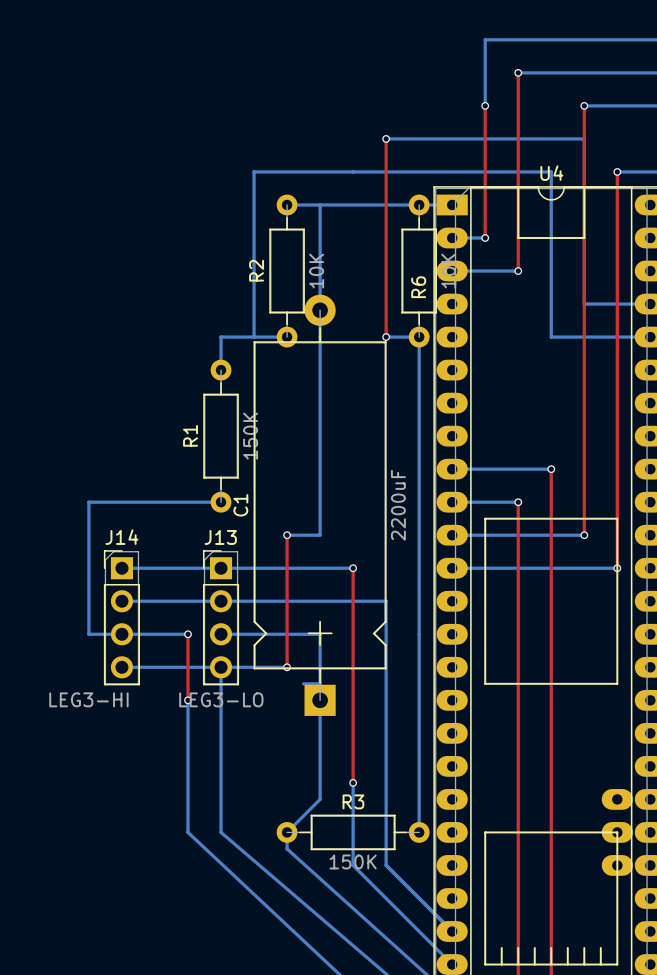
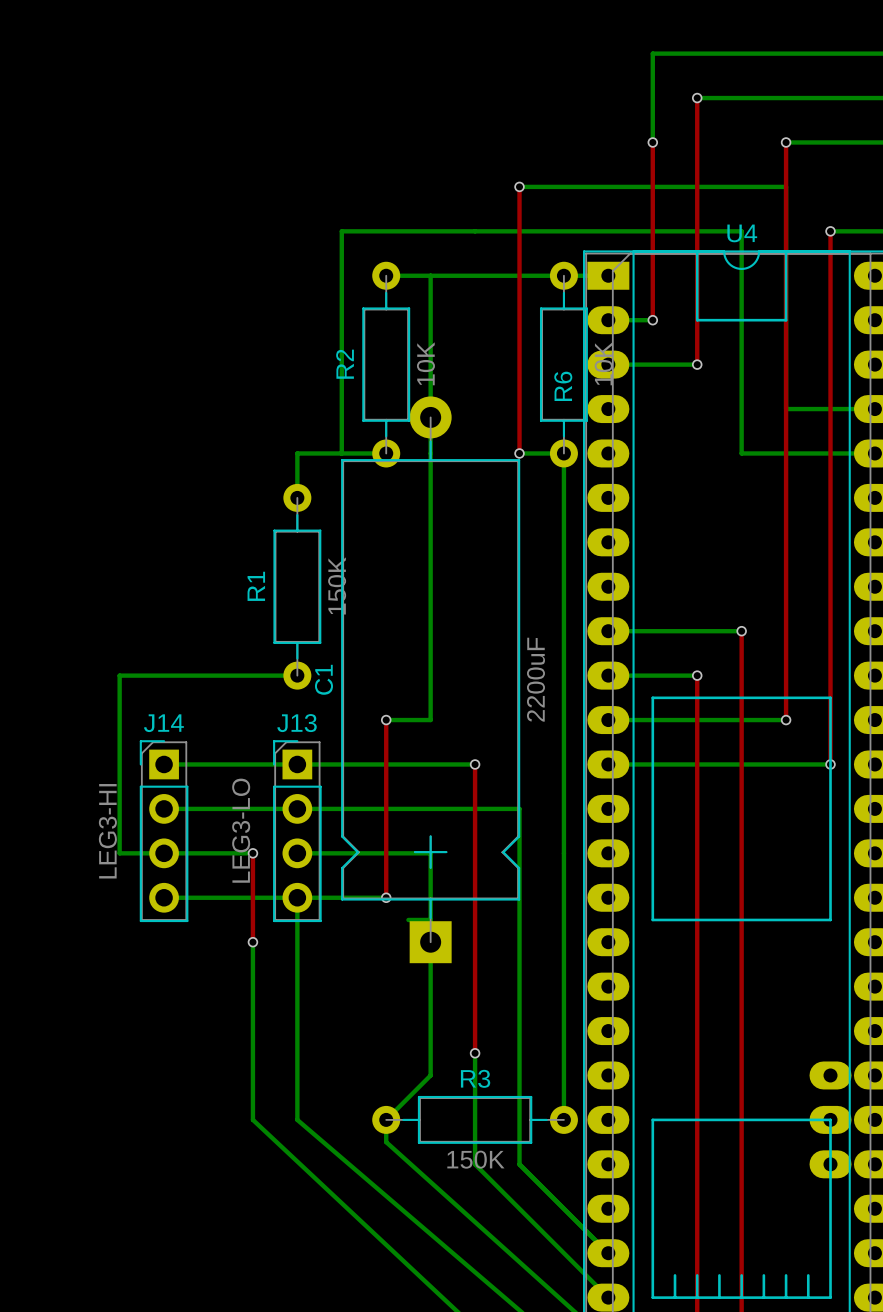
J14 value rotation: 0° (88, 699) -> 90° counterclockwise (107, 831)
J13 value rotation: 0° (221, 699) -> 90° counterclockwise (241, 830)

